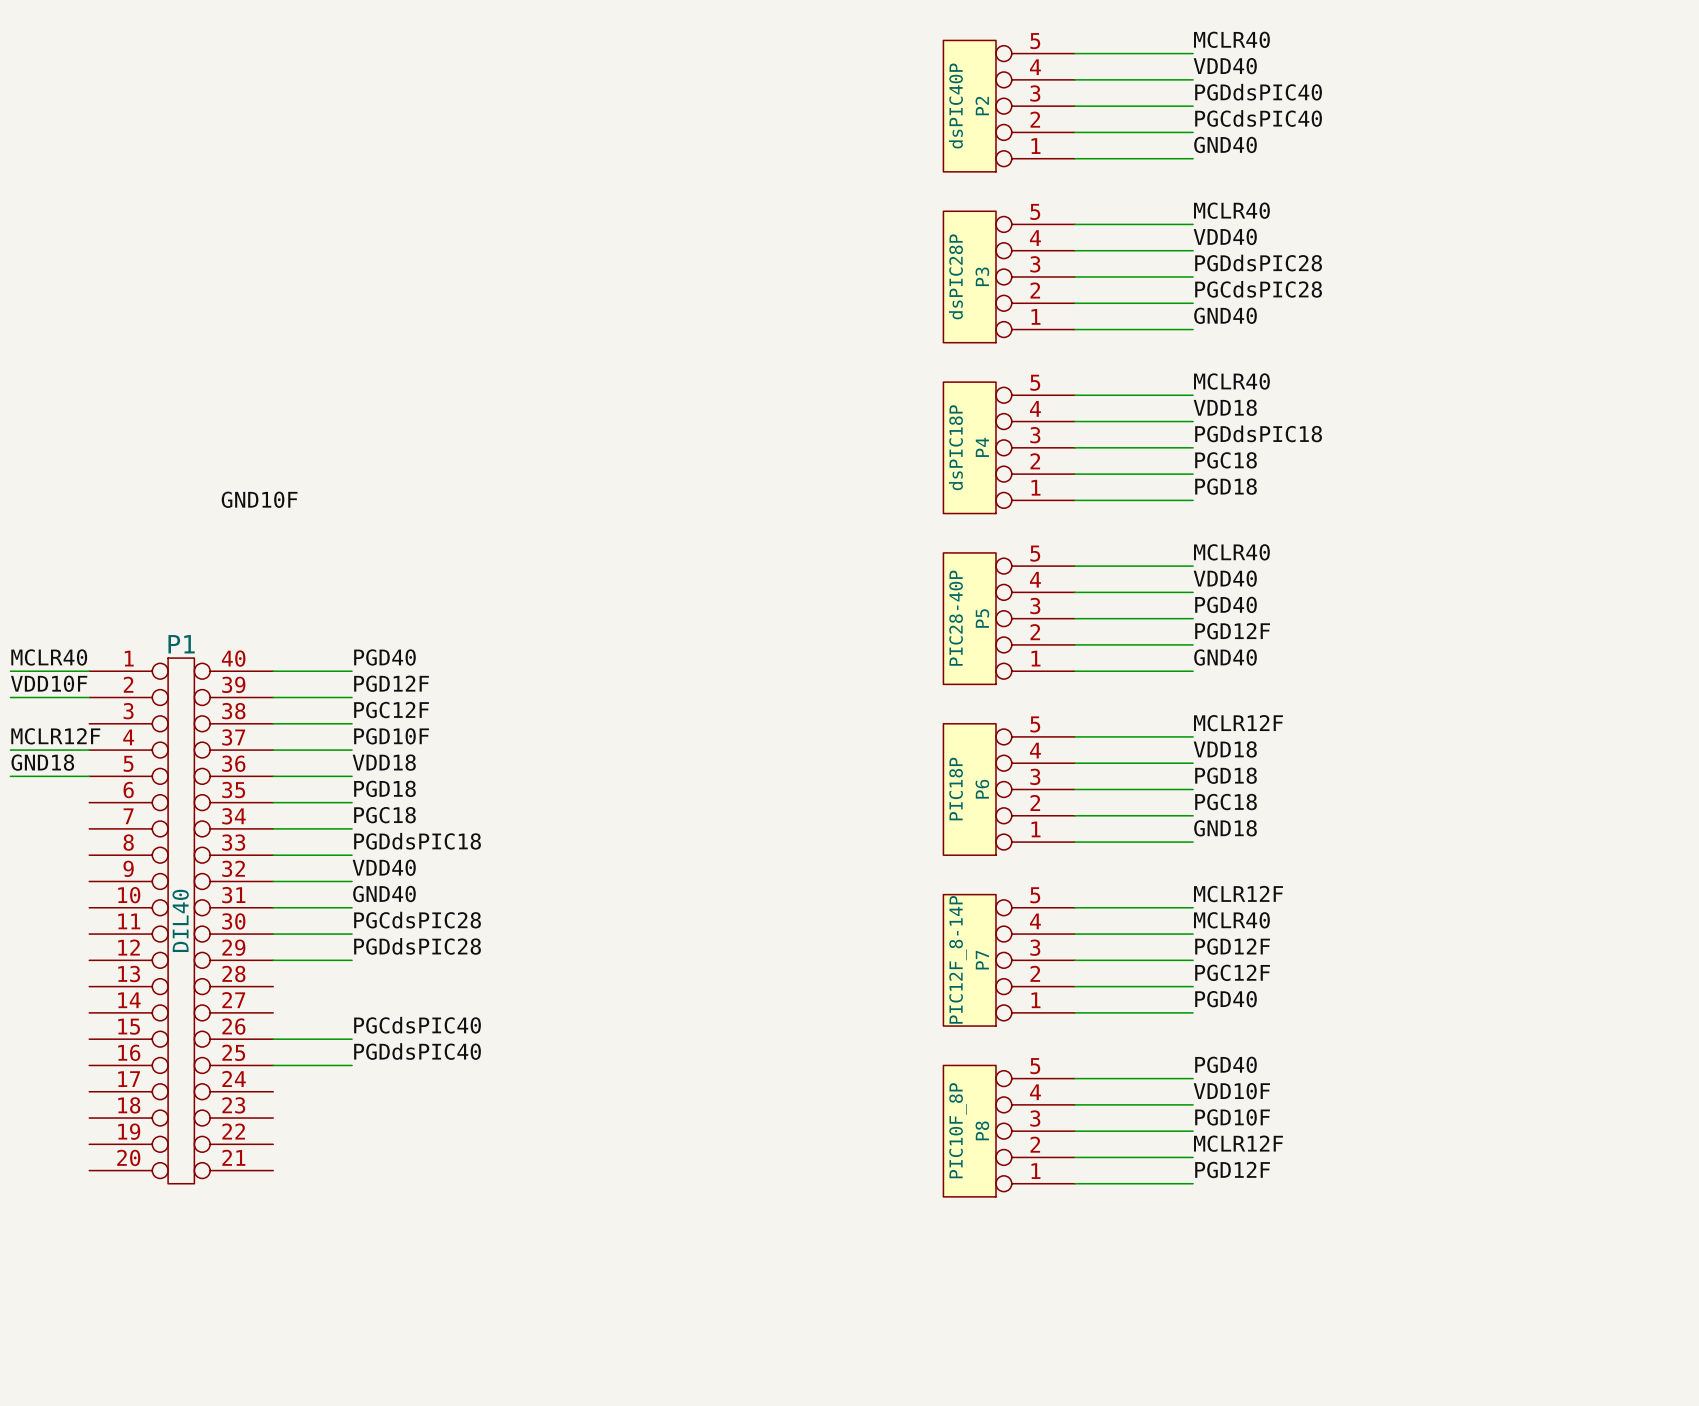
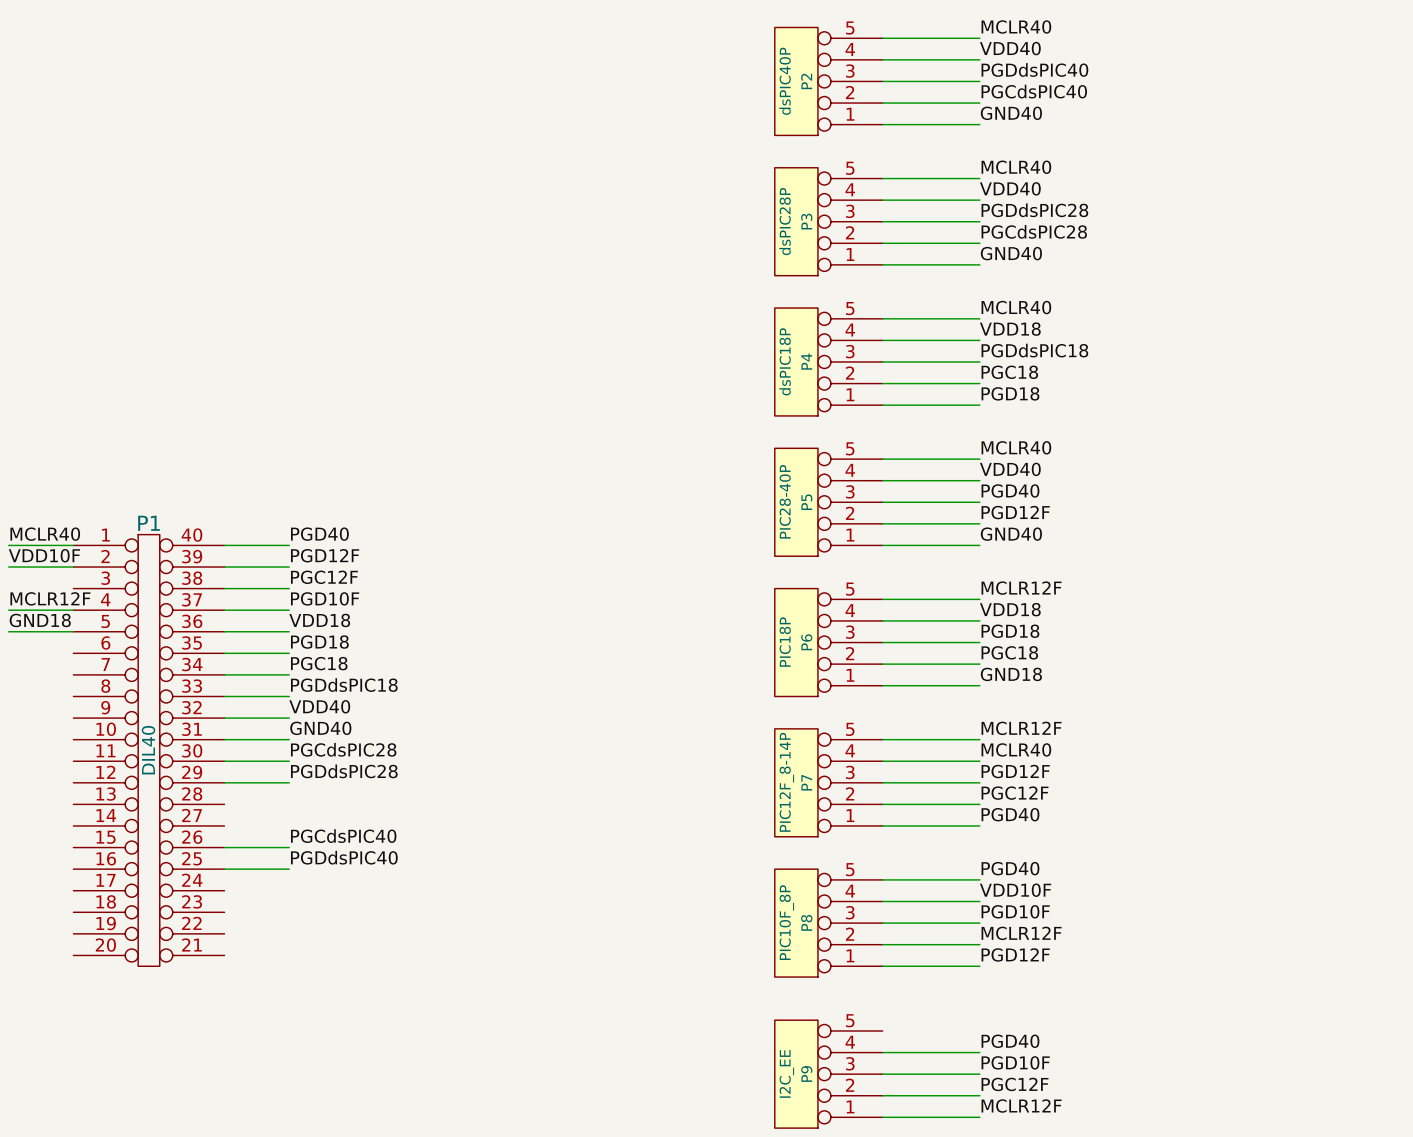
label: GND10F (259, 499) -> none
label: none -> PGD40 (1010, 1041)
wire: none -> (882, 1052) (979, 1052)
label: none -> PGD10F (1015, 1062)
P9: none -> I2C_EE (828, 1074)
wire: none -> (882, 1074) (979, 1074)
label: none -> PGC12F (1015, 1084)
wire: none -> (882, 1095) (979, 1095)
label: none -> MCLR12F (1021, 1106)
wire: none -> (882, 1117) (979, 1117)

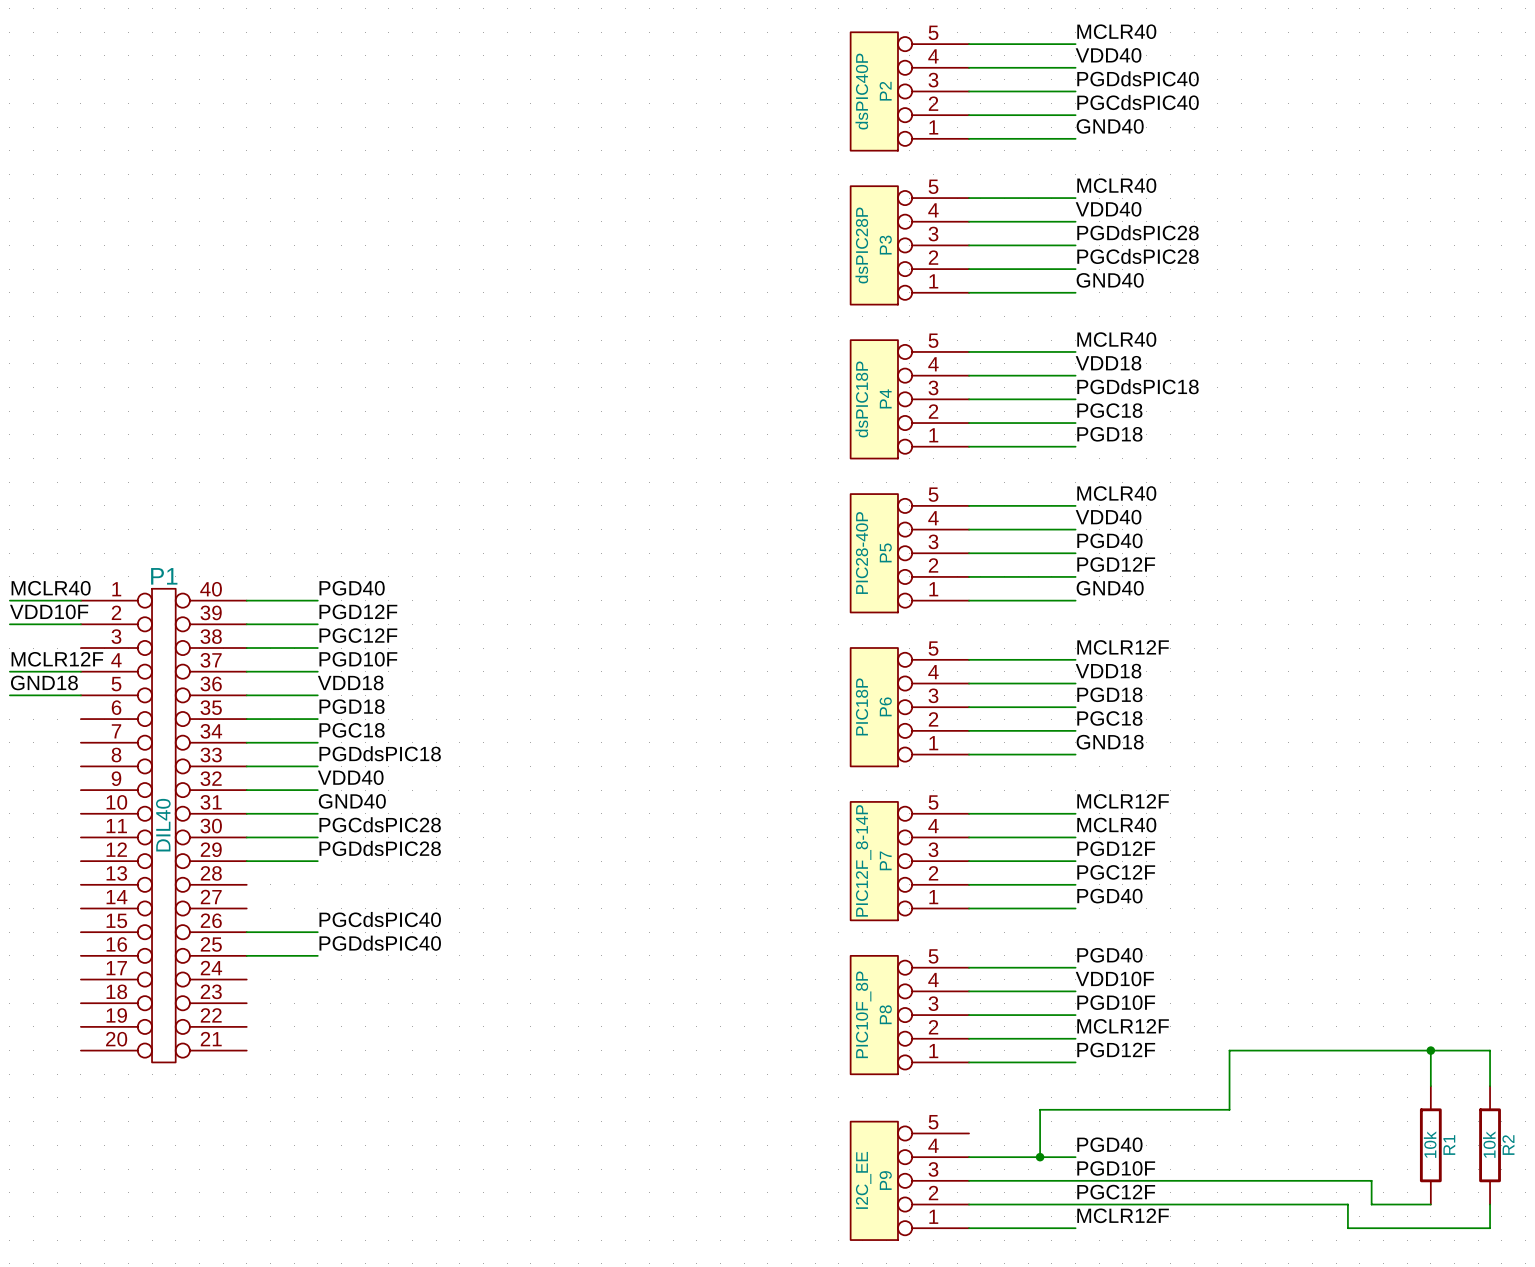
wire: none -> (1430, 1050) (1430, 1086)
junction: none -> (1430, 1050)
wire: none -> (1490, 1086) (1490, 1050) (1229, 1050) (1229, 1109) (1040, 1109) (1040, 1157)
R1: none -> 10k (1430, 1145)
R2: none -> 10k (1490, 1145)
junction: none -> (1040, 1157)
wire: none -> (1075, 1180) (1371, 1180) (1371, 1204) (1430, 1204)
wire: none -> (1075, 1204) (1347, 1204) (1347, 1228) (1490, 1228) (1490, 1204)

